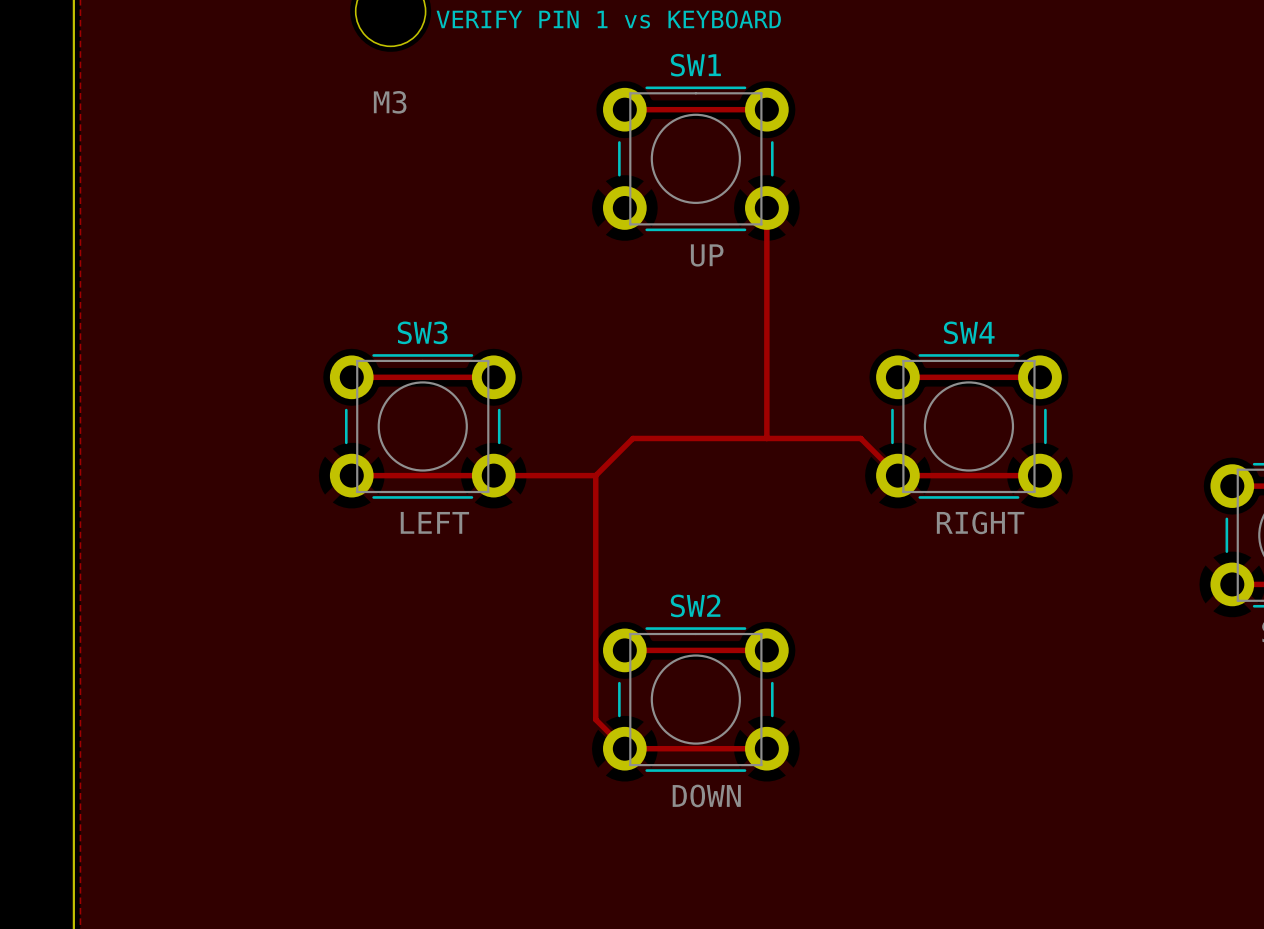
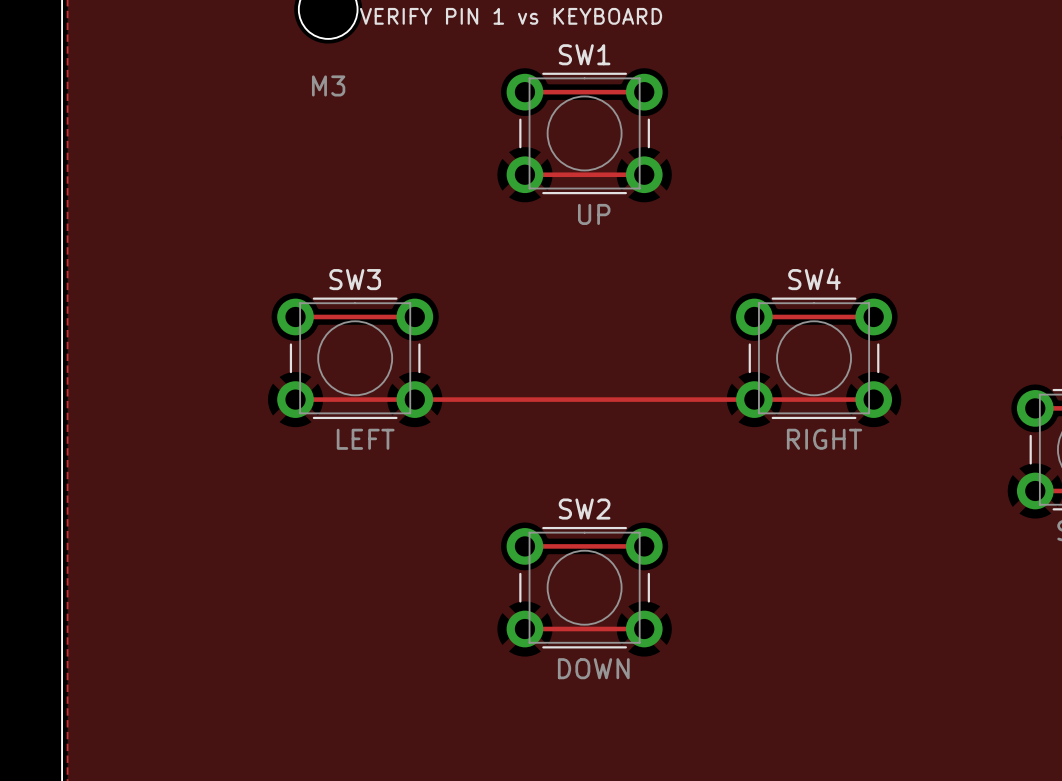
track: (766, 207) (766, 438) -> (644, 174) (524, 174)
track: (897, 475) (860, 438) (632, 438) (595, 475) (595, 719) (624, 748) -> (754, 399) (500, 399)

